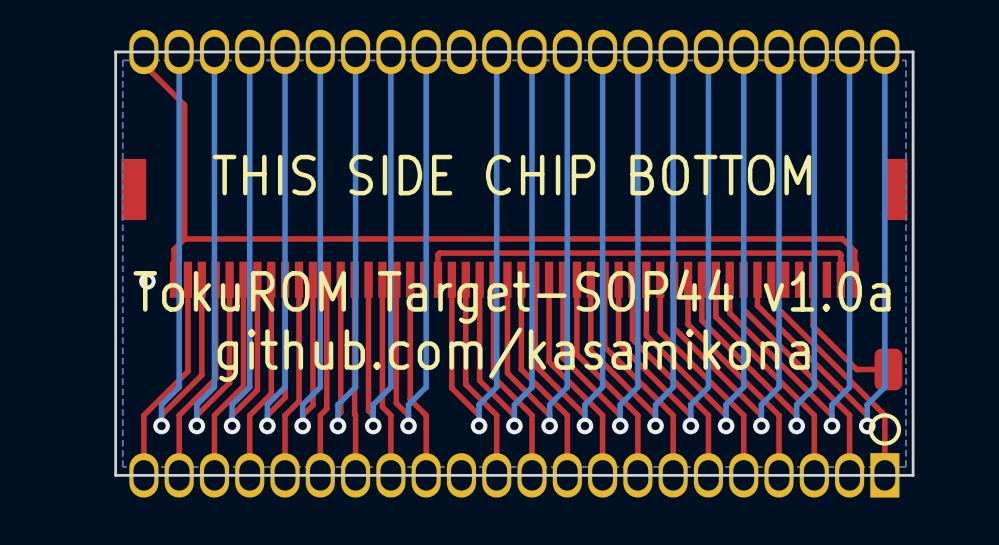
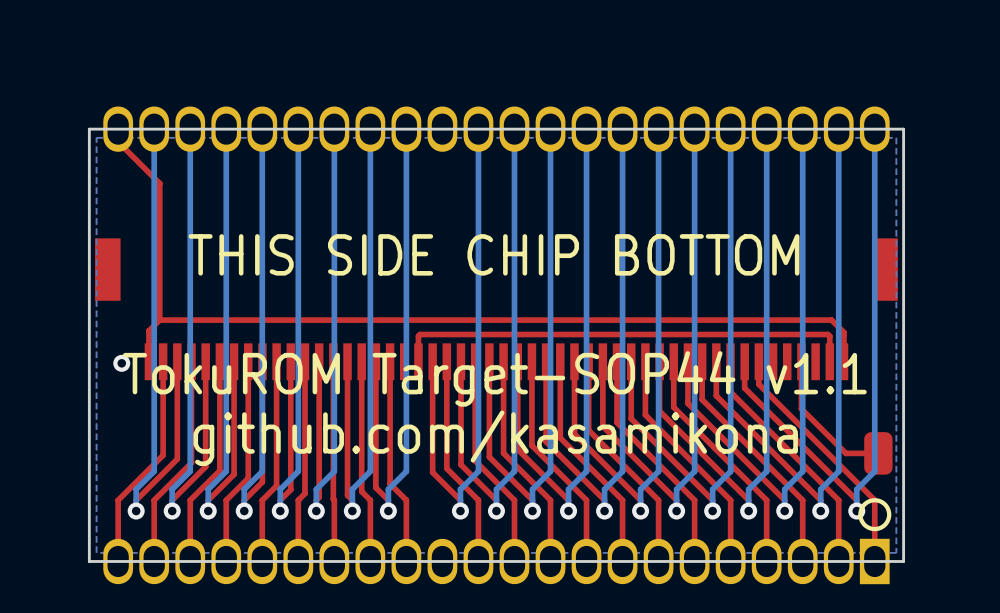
text: TokuROM Target-SOP44 v1.0a (512, 296) -> TokuROM Target-SOP44 v1.1 (494, 378)

